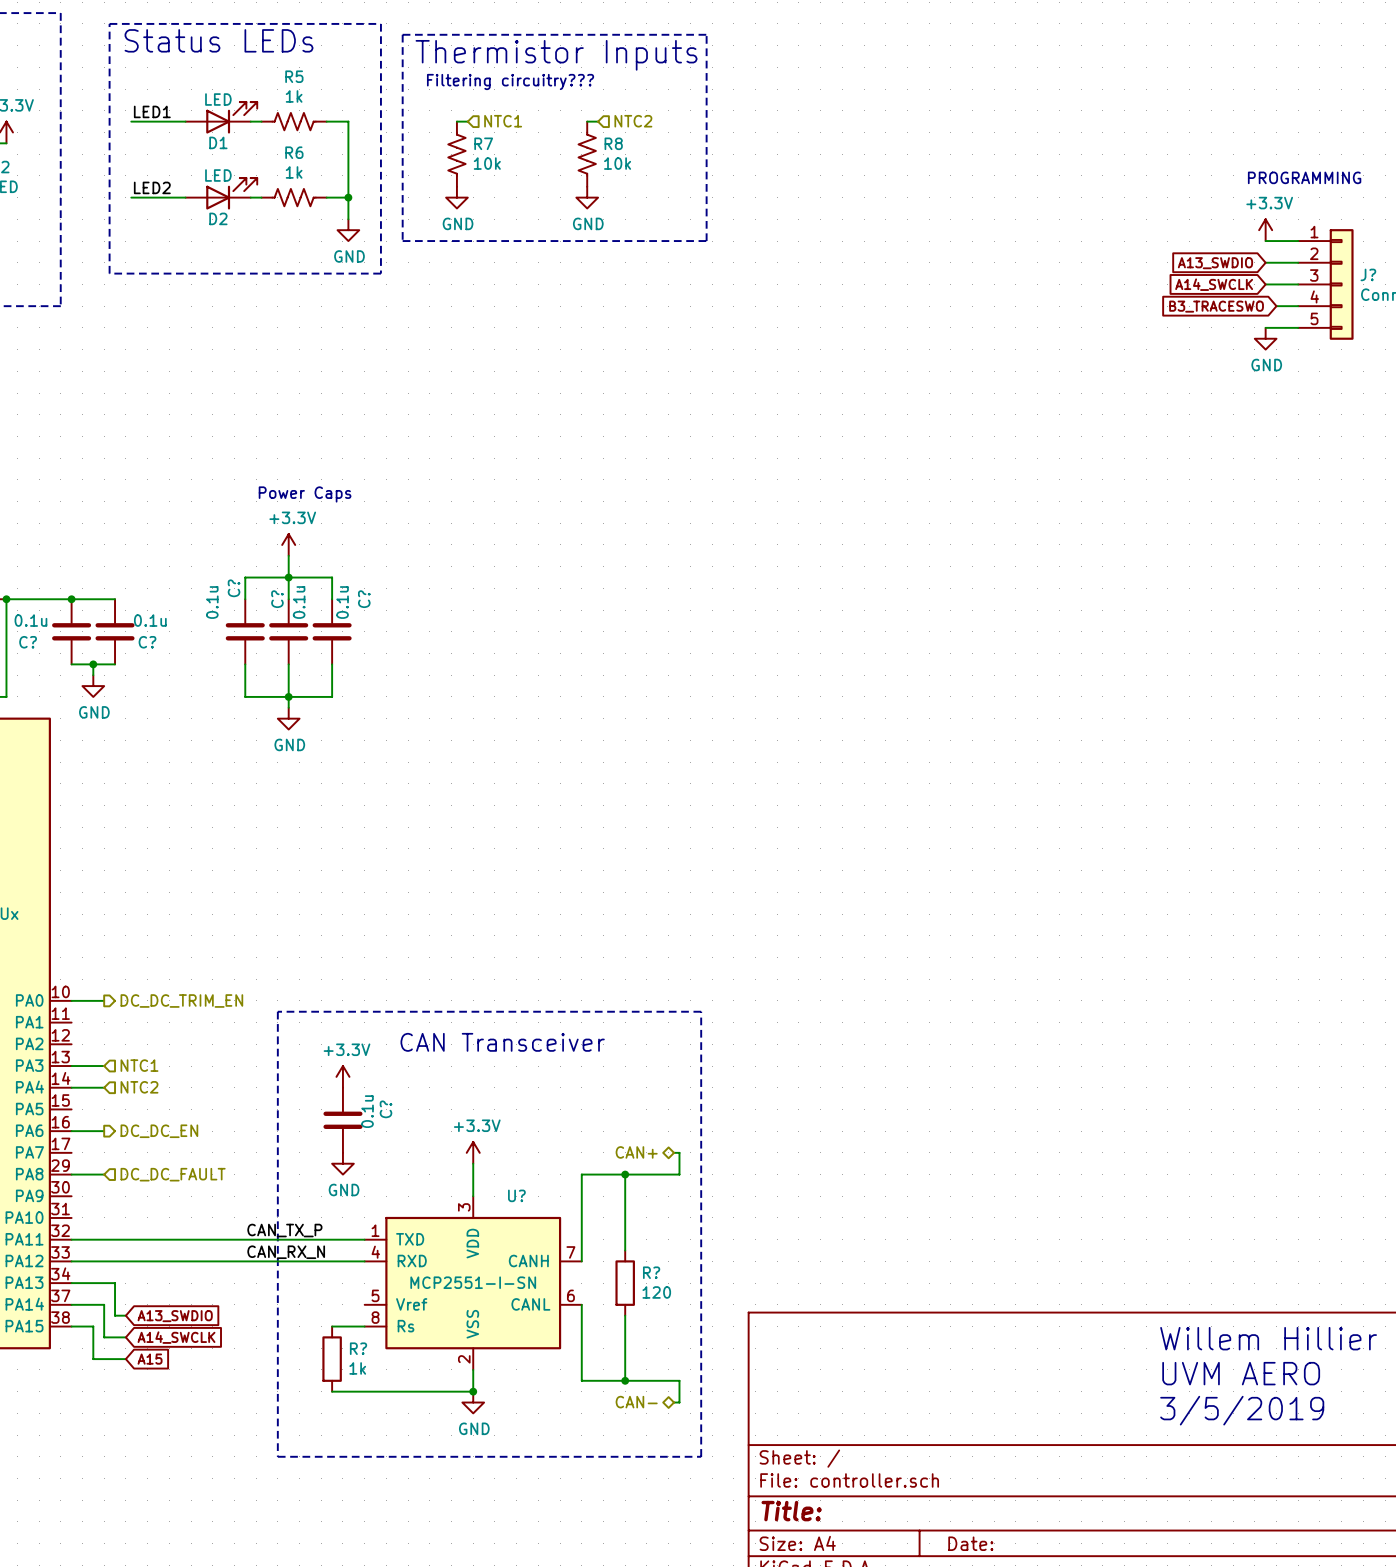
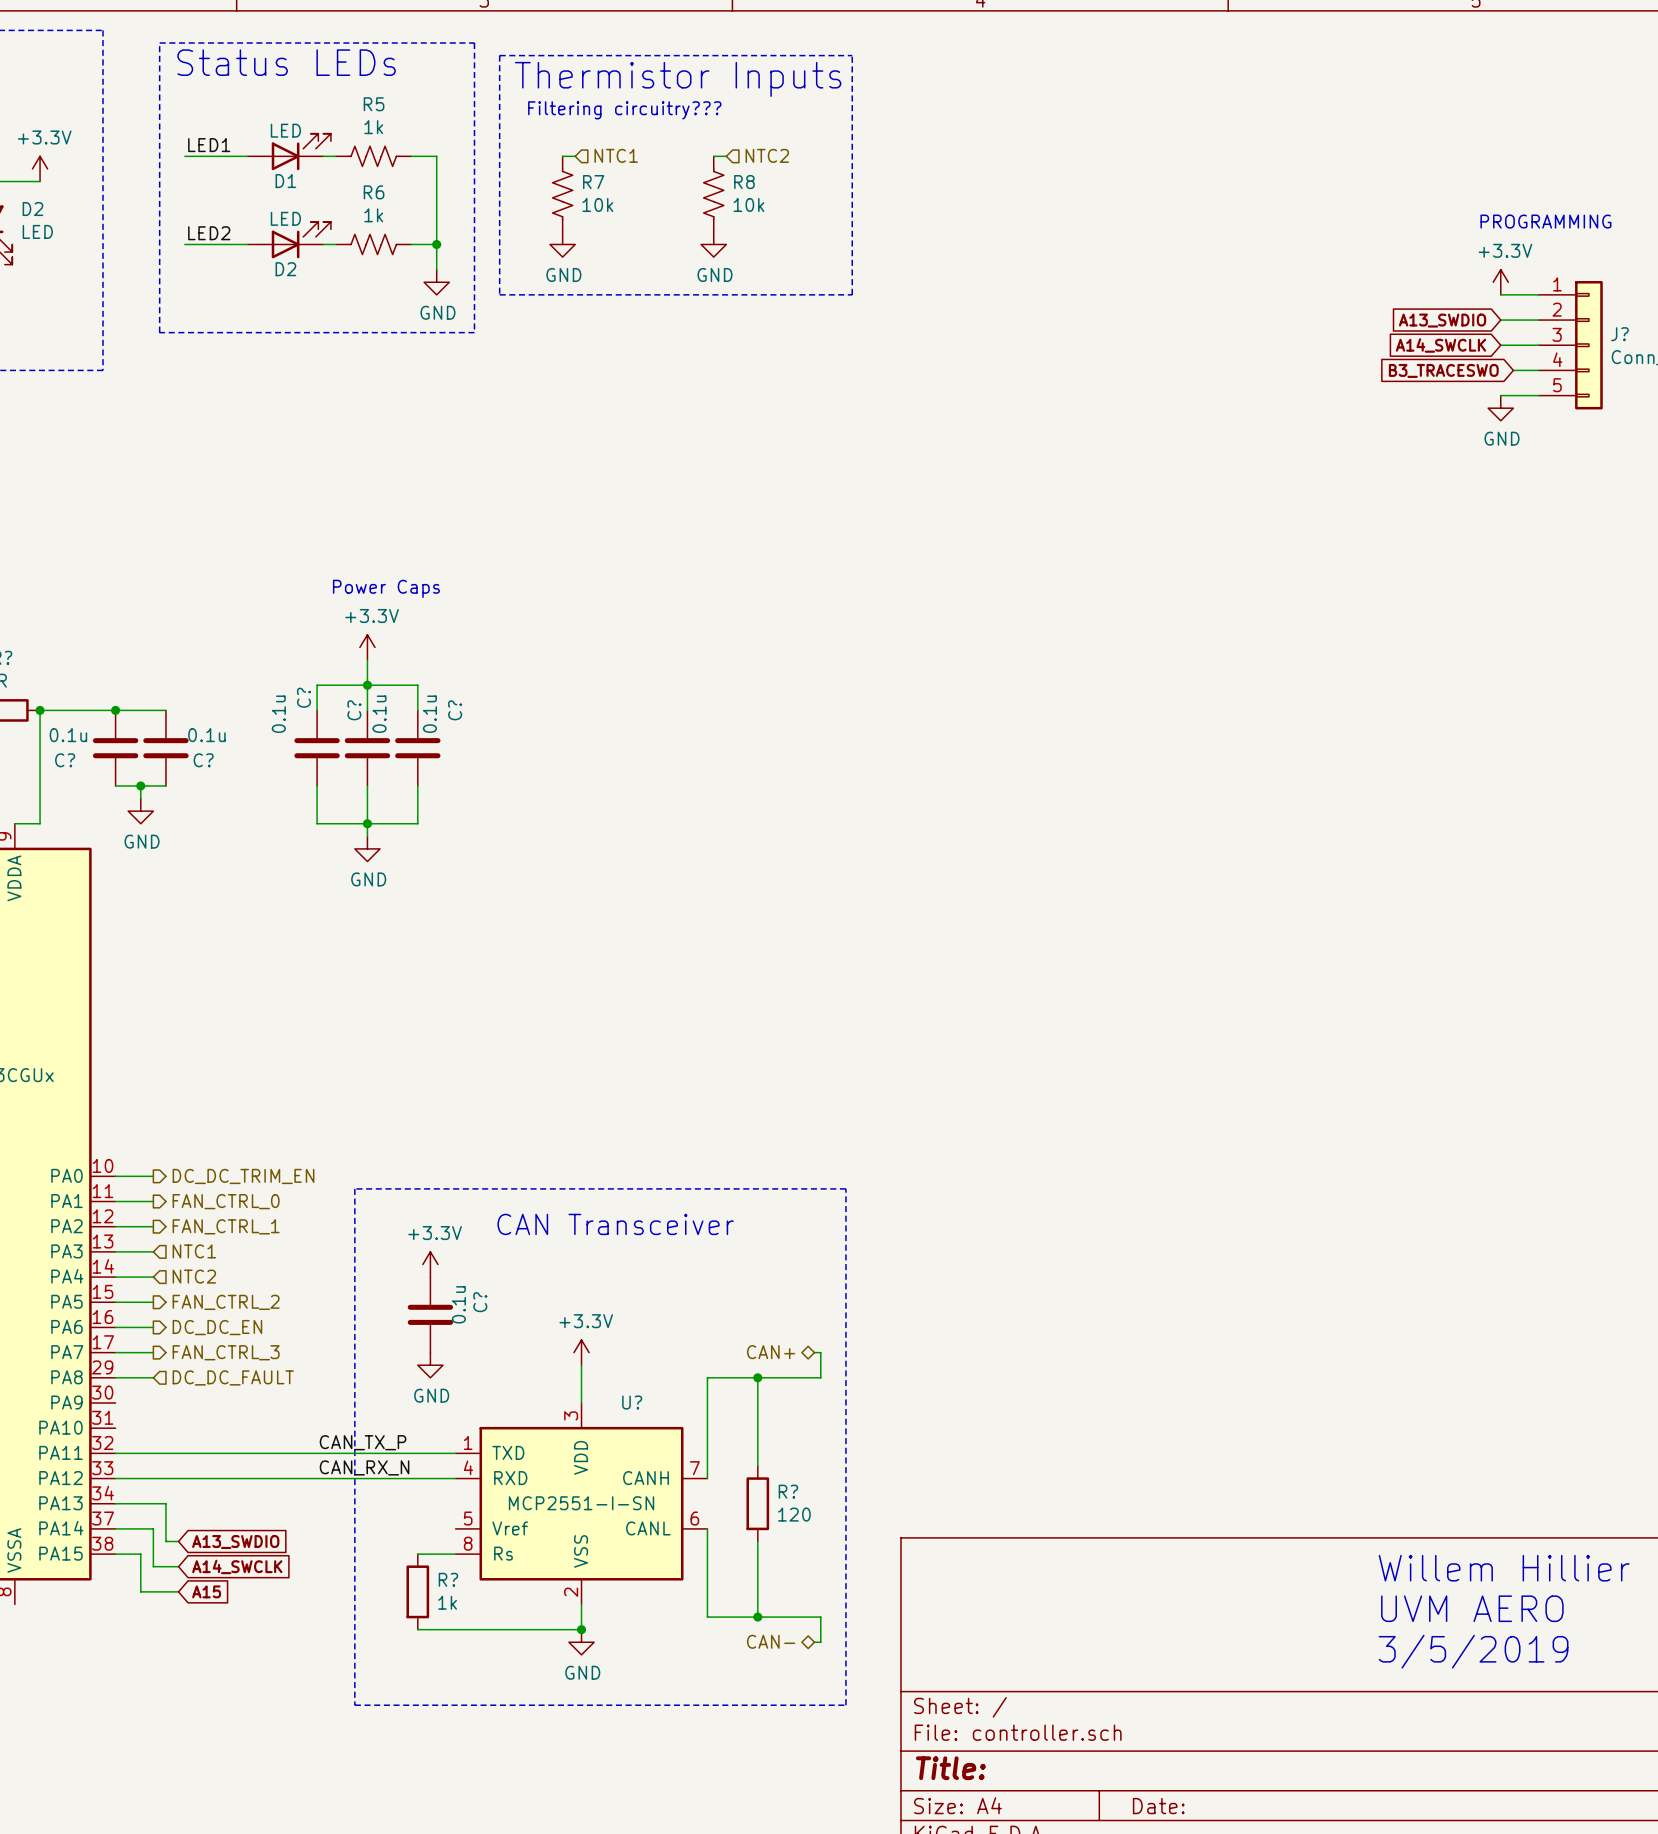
wire: none -> (115, 1201) (153, 1201)
hierarchical label: none -> FAN_CTRL_0 (226, 1201)
wire: none -> (115, 1226) (153, 1226)
hierarchical label: none -> FAN_CTRL_1 (226, 1226)
wire: none -> (115, 1302) (153, 1302)
hierarchical label: none -> FAN_CTRL_2 (226, 1302)
wire: none -> (115, 1352) (153, 1352)
hierarchical label: none -> FAN_CTRL_3 (226, 1352)

